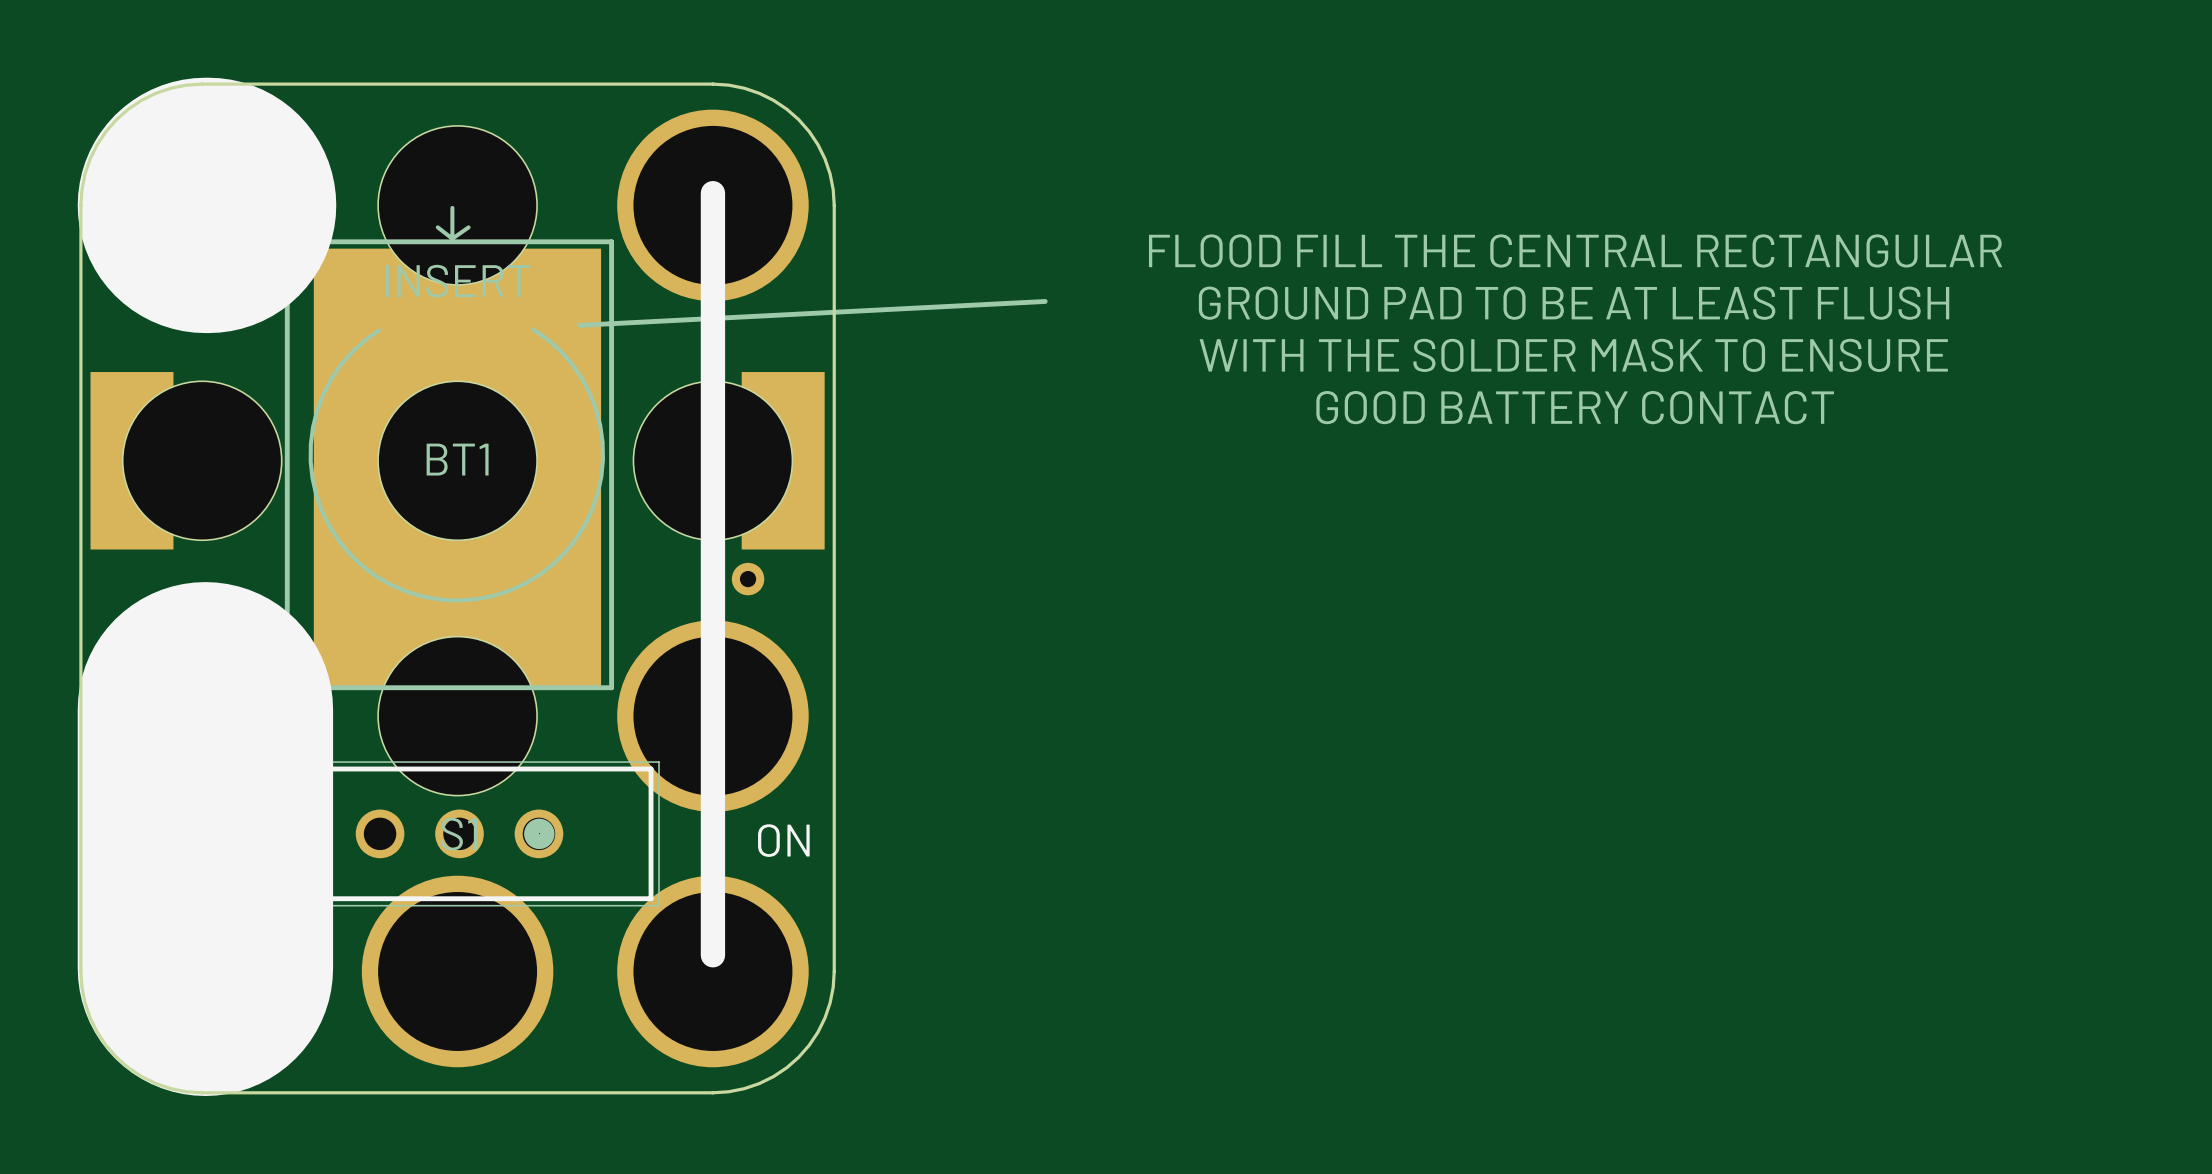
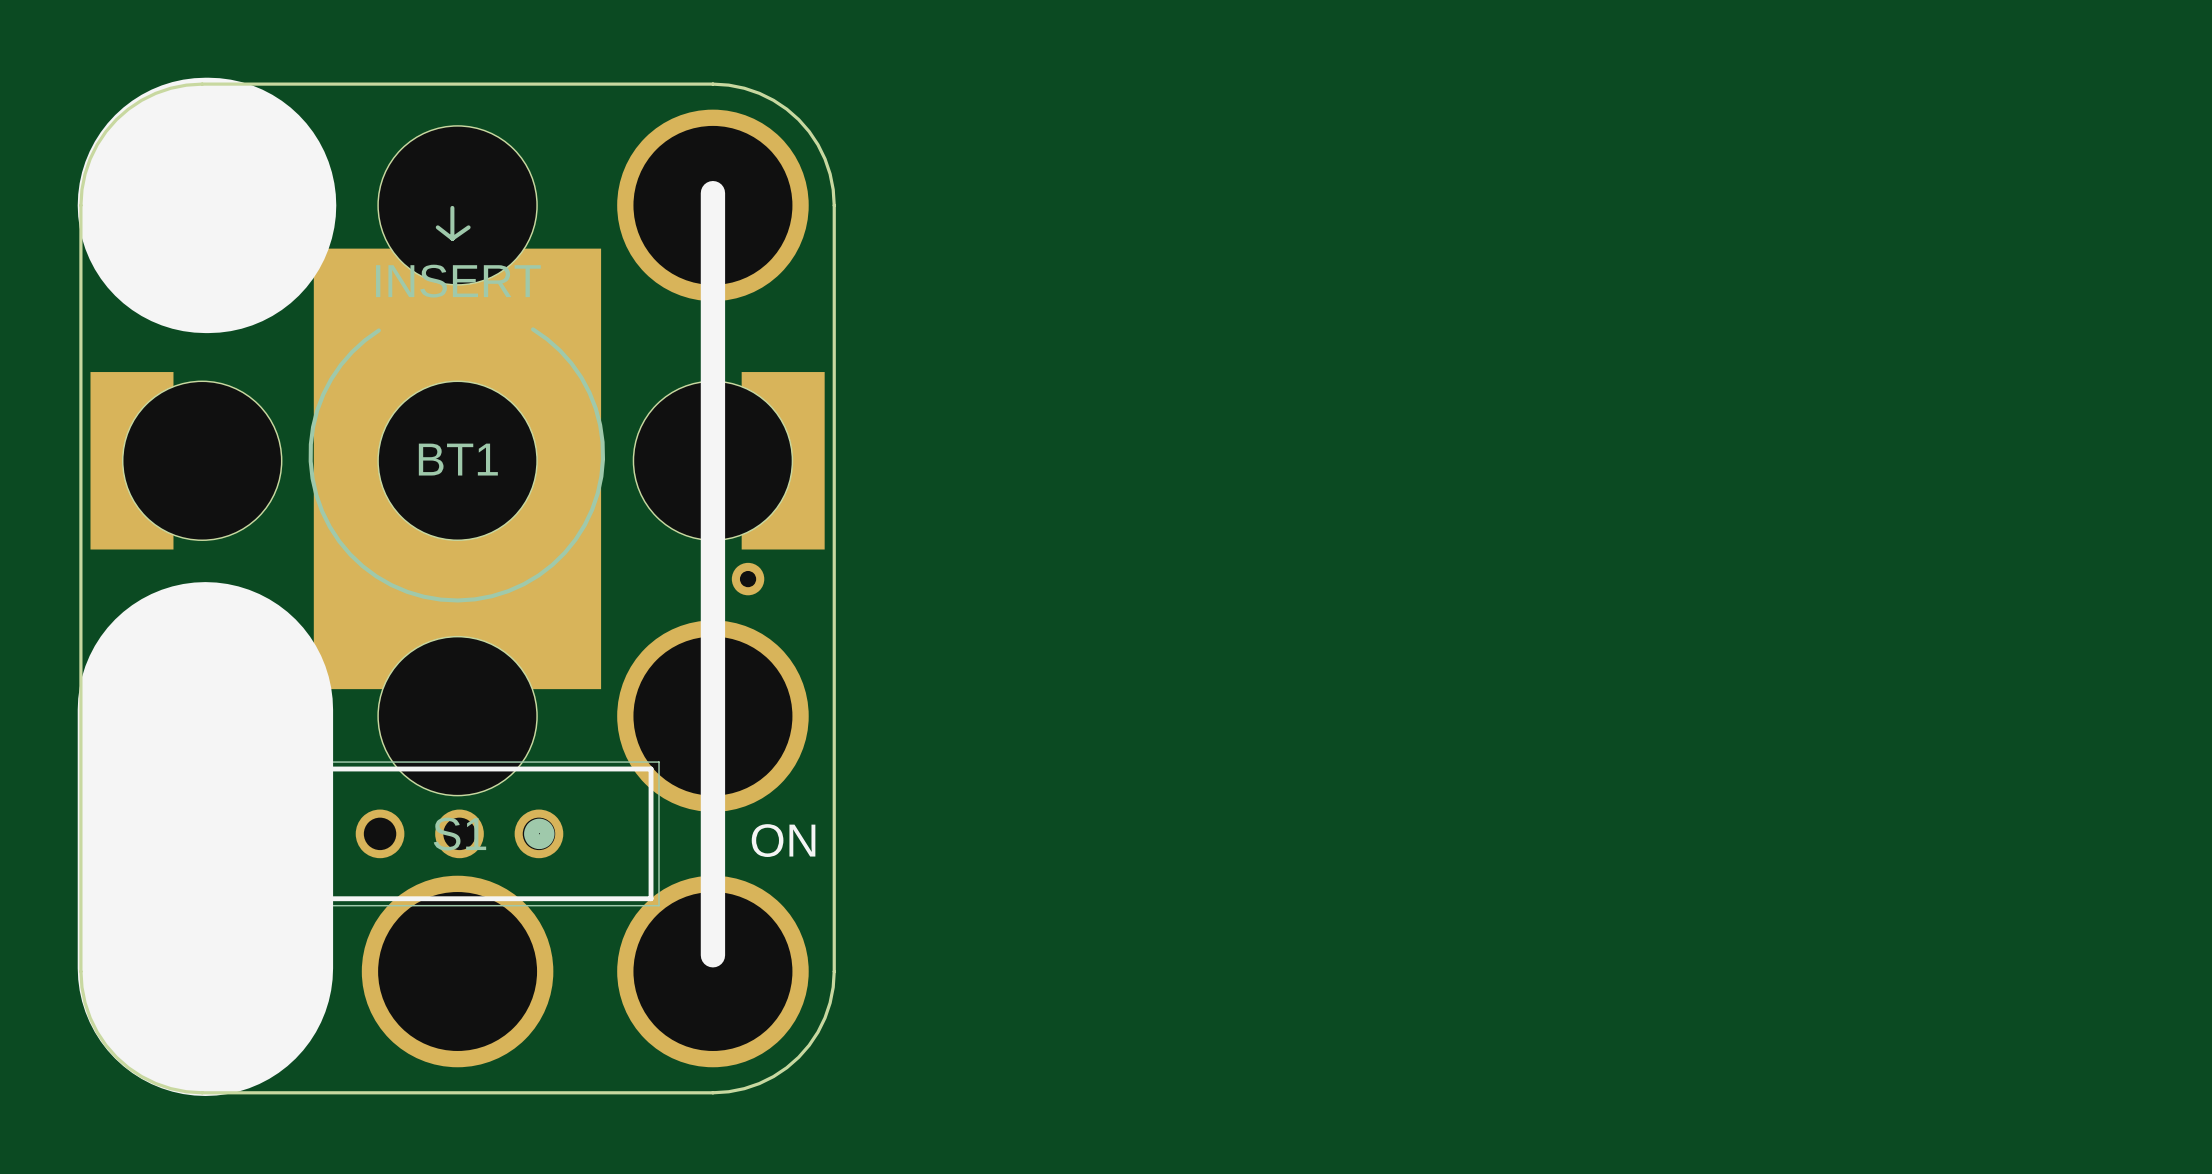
line: (287, 241) (287, 687) (611, 687) (611, 241) (287, 241) -> none
text: FLOOD FILL THE CENTRAL RECTANGULAR (1575, 250) -> none
line: (1045, 301) (580, 325) -> none
text: GROUND PAD TO BE AT LEAST FLUSH (1574, 303) -> none
text: WITH THE SOLDER MASK TO ENSURE (1573, 355) -> none
text: GOOD BATTERY CONTACT (1575, 407) -> none

